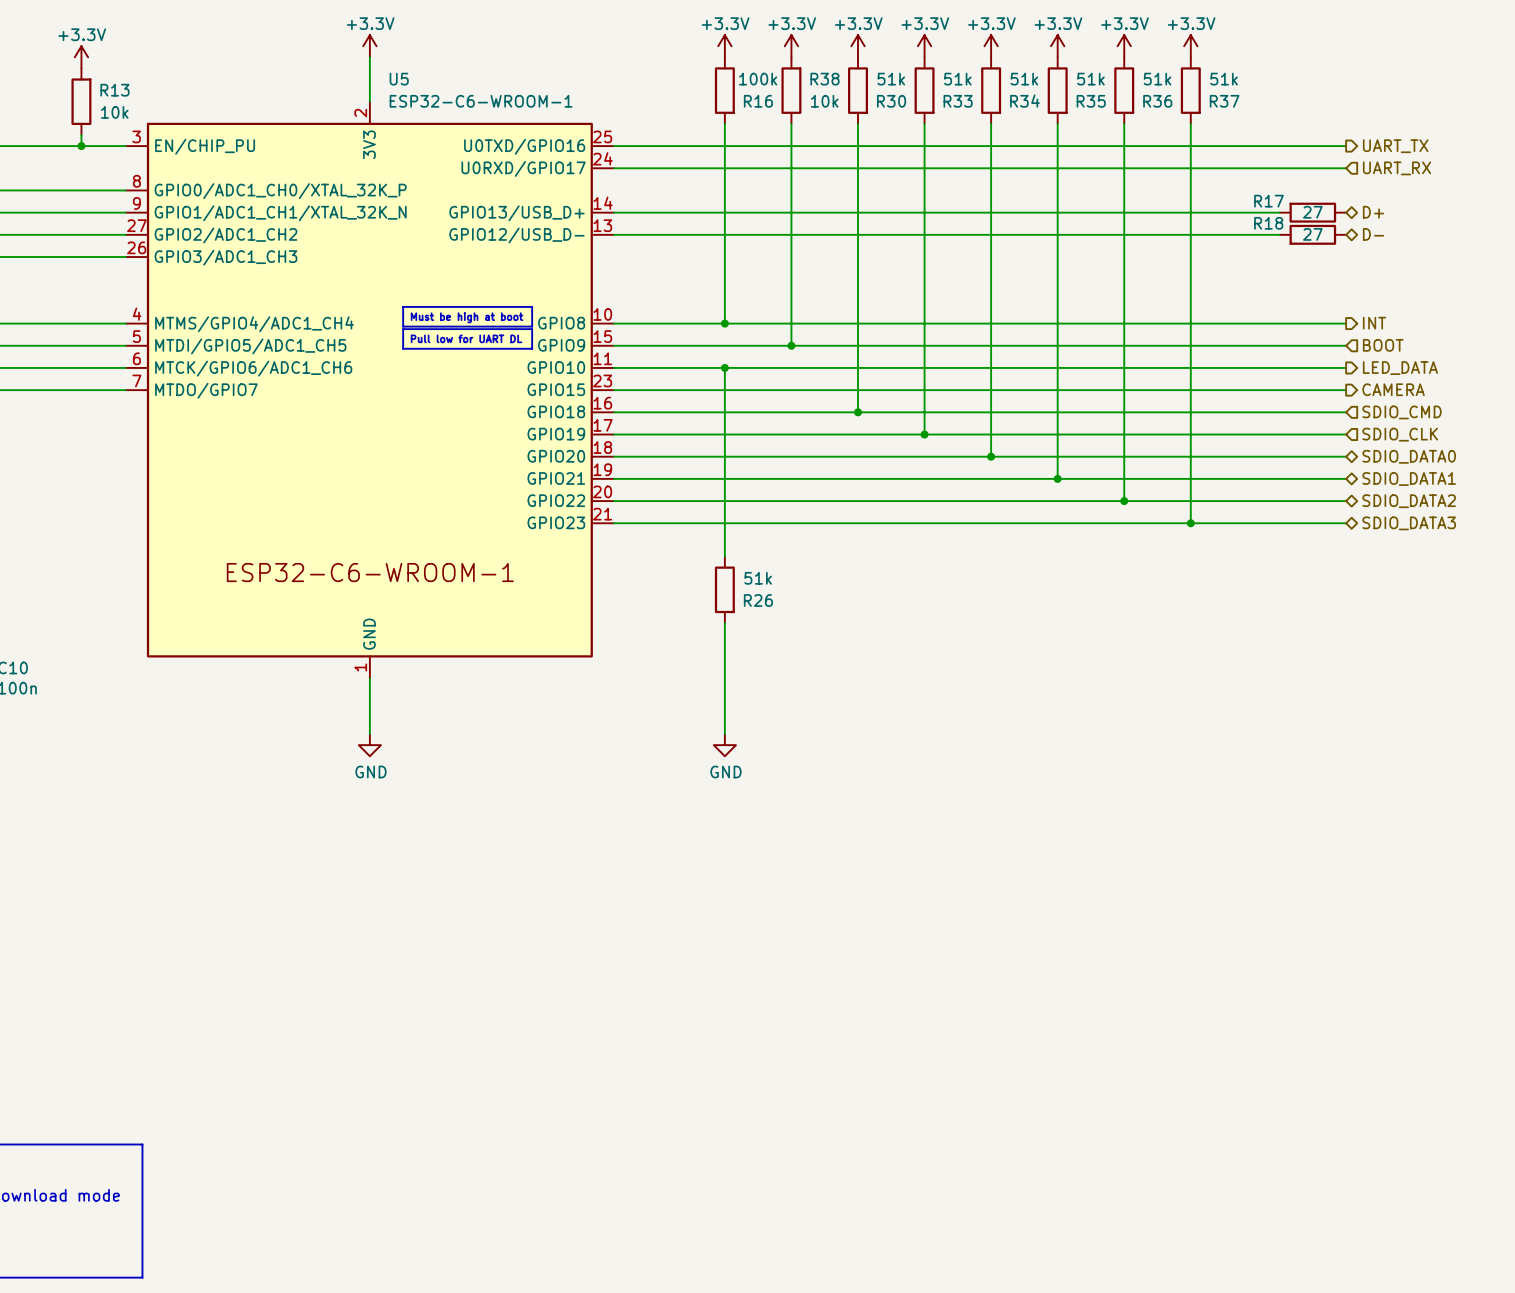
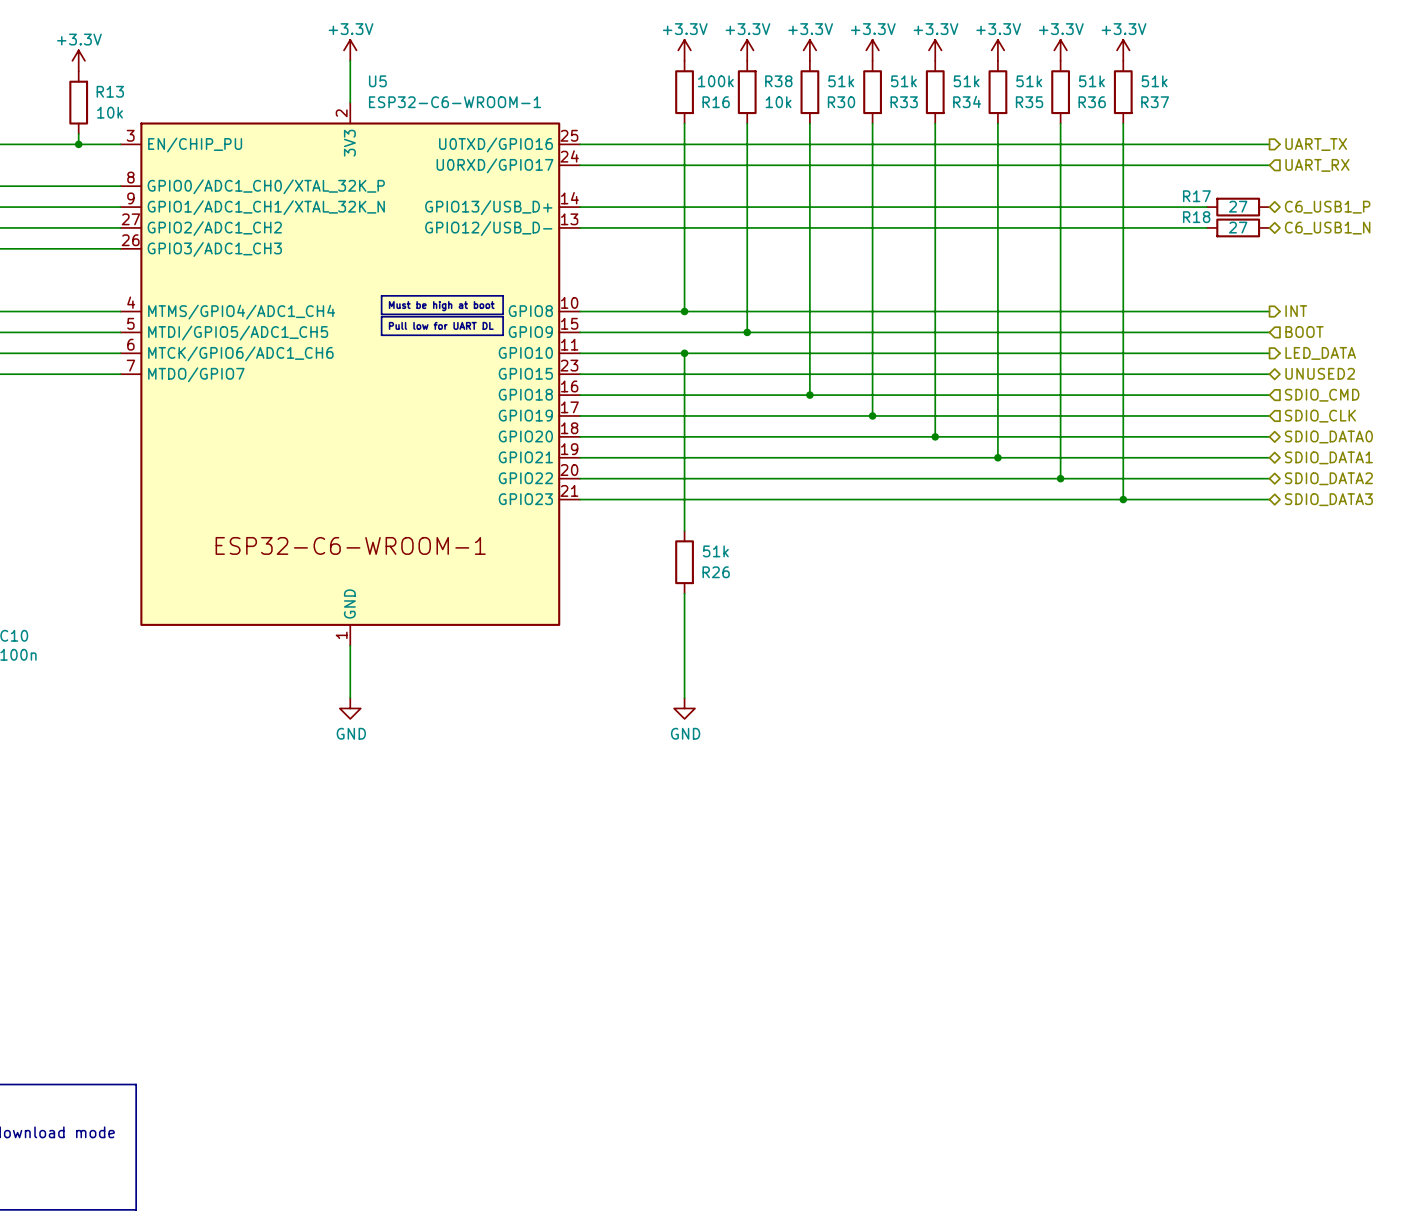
hierarchical label: D+ (1373, 212) -> C6_USB1_P (1327, 207)
hierarchical label: D- (1373, 234) -> C6_USB1_N (1327, 228)
hierarchical label shape: output (1393, 389) -> bidirectional (1320, 373)
hierarchical label: CAMERA (1393, 389) -> UNUSED2 (1320, 373)

